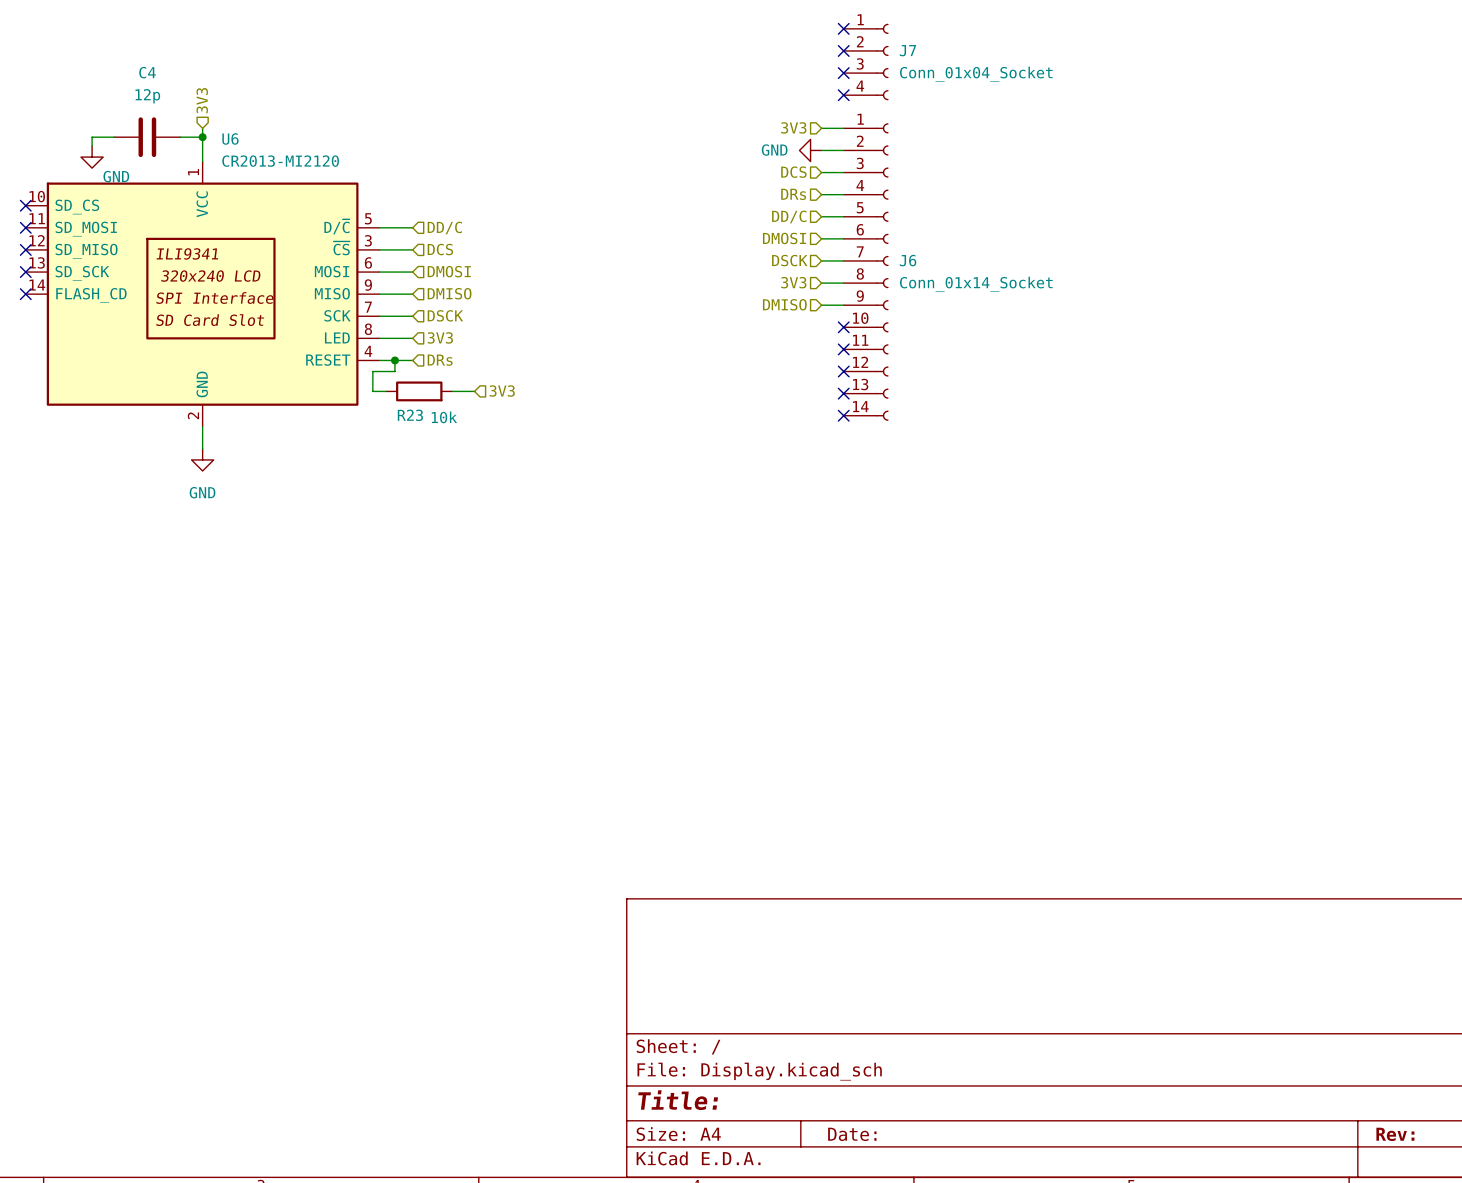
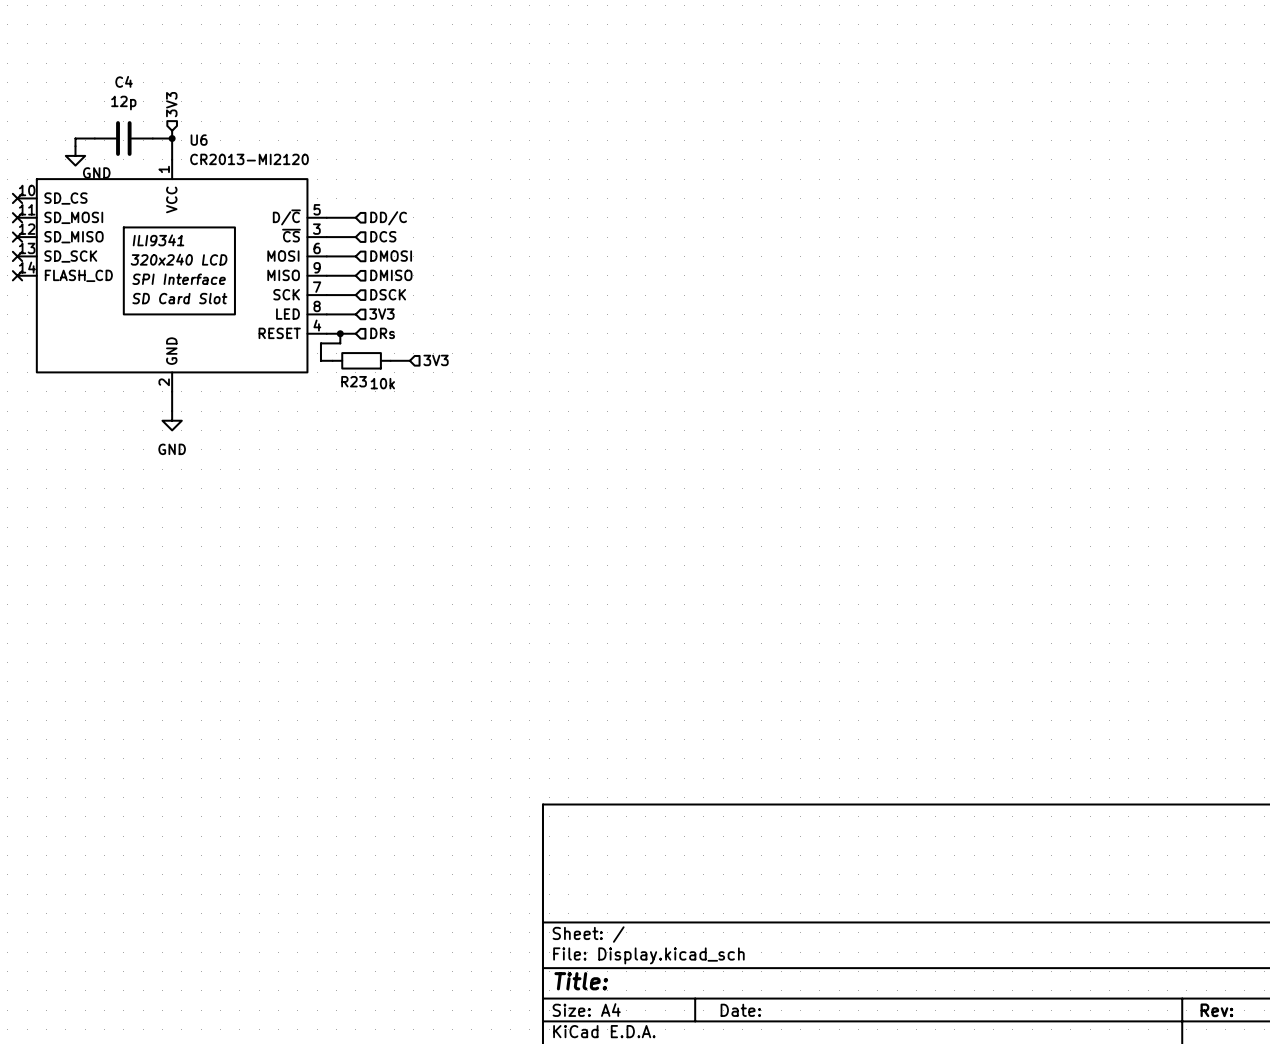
no-connect mark: (843, 28) -> none
no-connect mark: (843, 50) -> none
J7: Conn_01x04_Socket (866, 62) -> none
no-connect mark: (843, 73) -> none
no-connect mark: (843, 95) -> none
hierarchical label: 3V3 (793, 127) -> none
wire: (821, 128) (843, 128) -> none
power symbol: GND (810, 150) -> none
wire: (821, 150) (843, 150) -> none
hierarchical label: DCS (793, 172) -> none
wire: (821, 172) (843, 172) -> none
hierarchical label: DRs (793, 194) -> none
wire: (821, 194) (843, 194) -> none
hierarchical label: DD/C (789, 216) -> none
wire: (821, 216) (843, 216) -> none
hierarchical label: DMOSI (784, 238) -> none
wire: (821, 238) (843, 238) -> none
hierarchical label: DSCK (789, 260) -> none
wire: (821, 260) (843, 260) -> none
J6: Conn_01x14_Socket (866, 272) -> none
hierarchical label: 3V3 (793, 282) -> none
wire: (821, 283) (843, 283) -> none
hierarchical label: DMISO (784, 304) -> none
wire: (821, 305) (843, 305) -> none
no-connect mark: (843, 327) -> none
no-connect mark: (843, 349) -> none
no-connect mark: (843, 371) -> none
no-connect mark: (843, 393) -> none
no-connect mark: (843, 415) -> none

